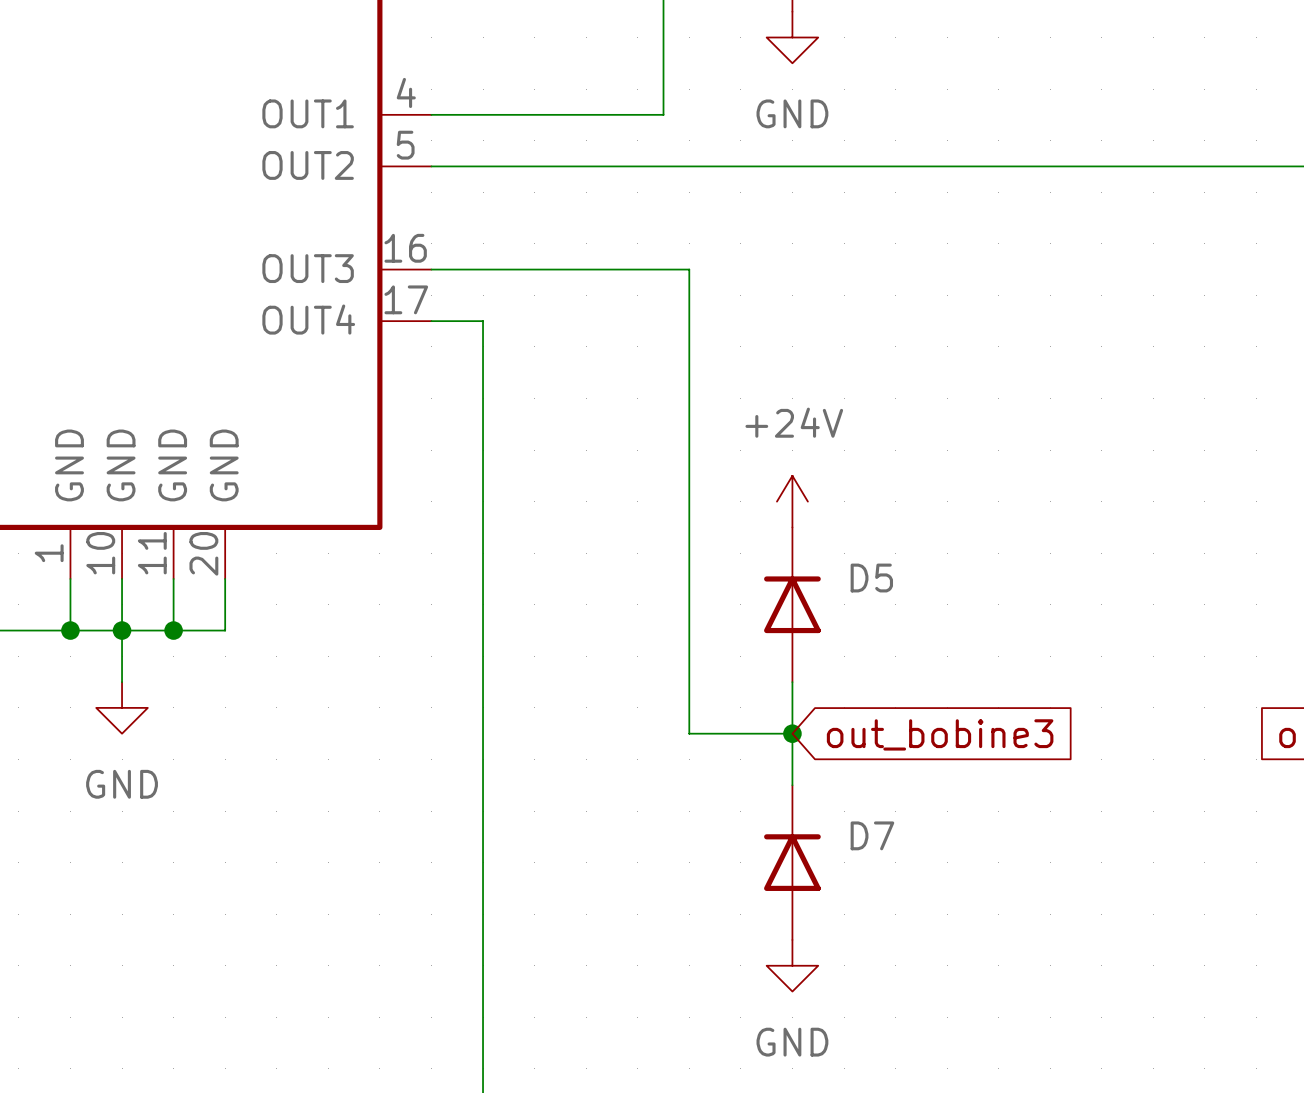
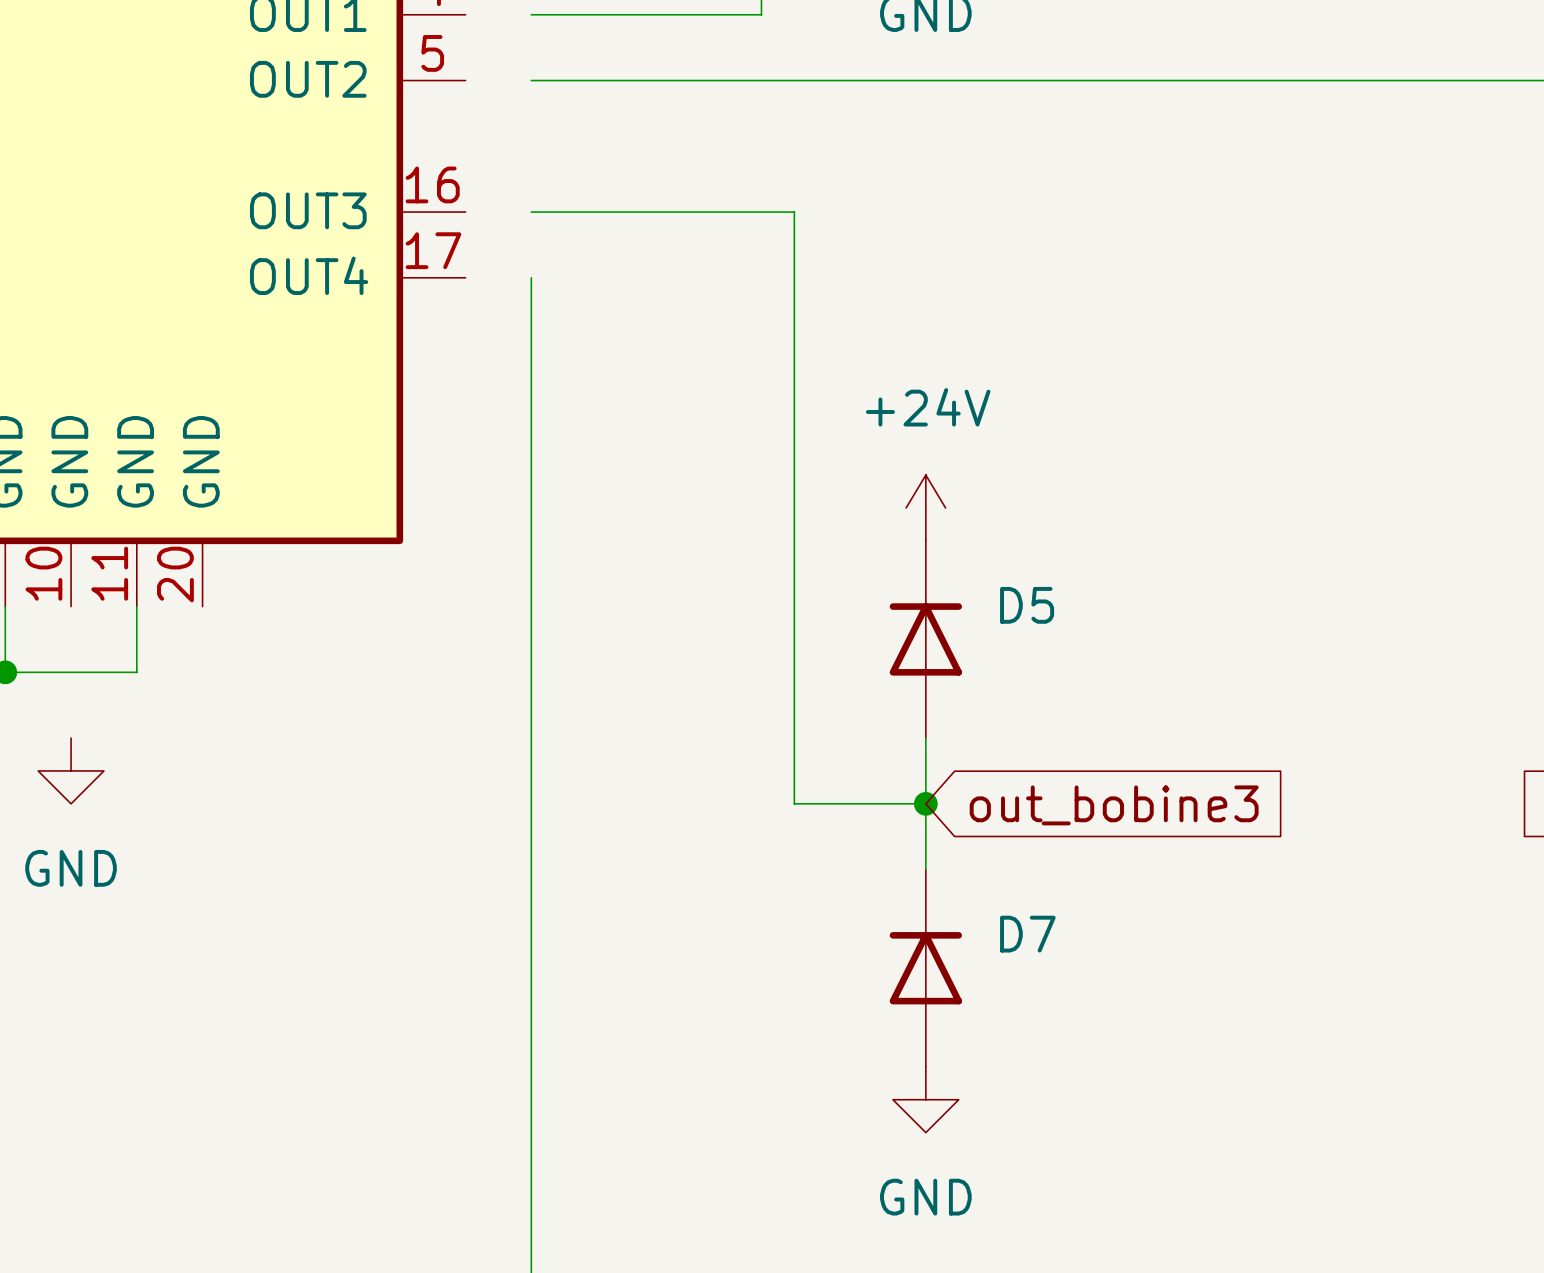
wire: (431, 114) (483, 114) -> none
wire: (431, 166) (483, 166) -> none
wire: (431, 269) (483, 269) -> none
wire: (431, 321) (483, 321) -> none
wire: (122, 578) (122, 682) -> none
wire: (225, 578) (225, 630) (173, 630) -> none
junction: (122, 630) -> none
junction: (173, 630) -> none

